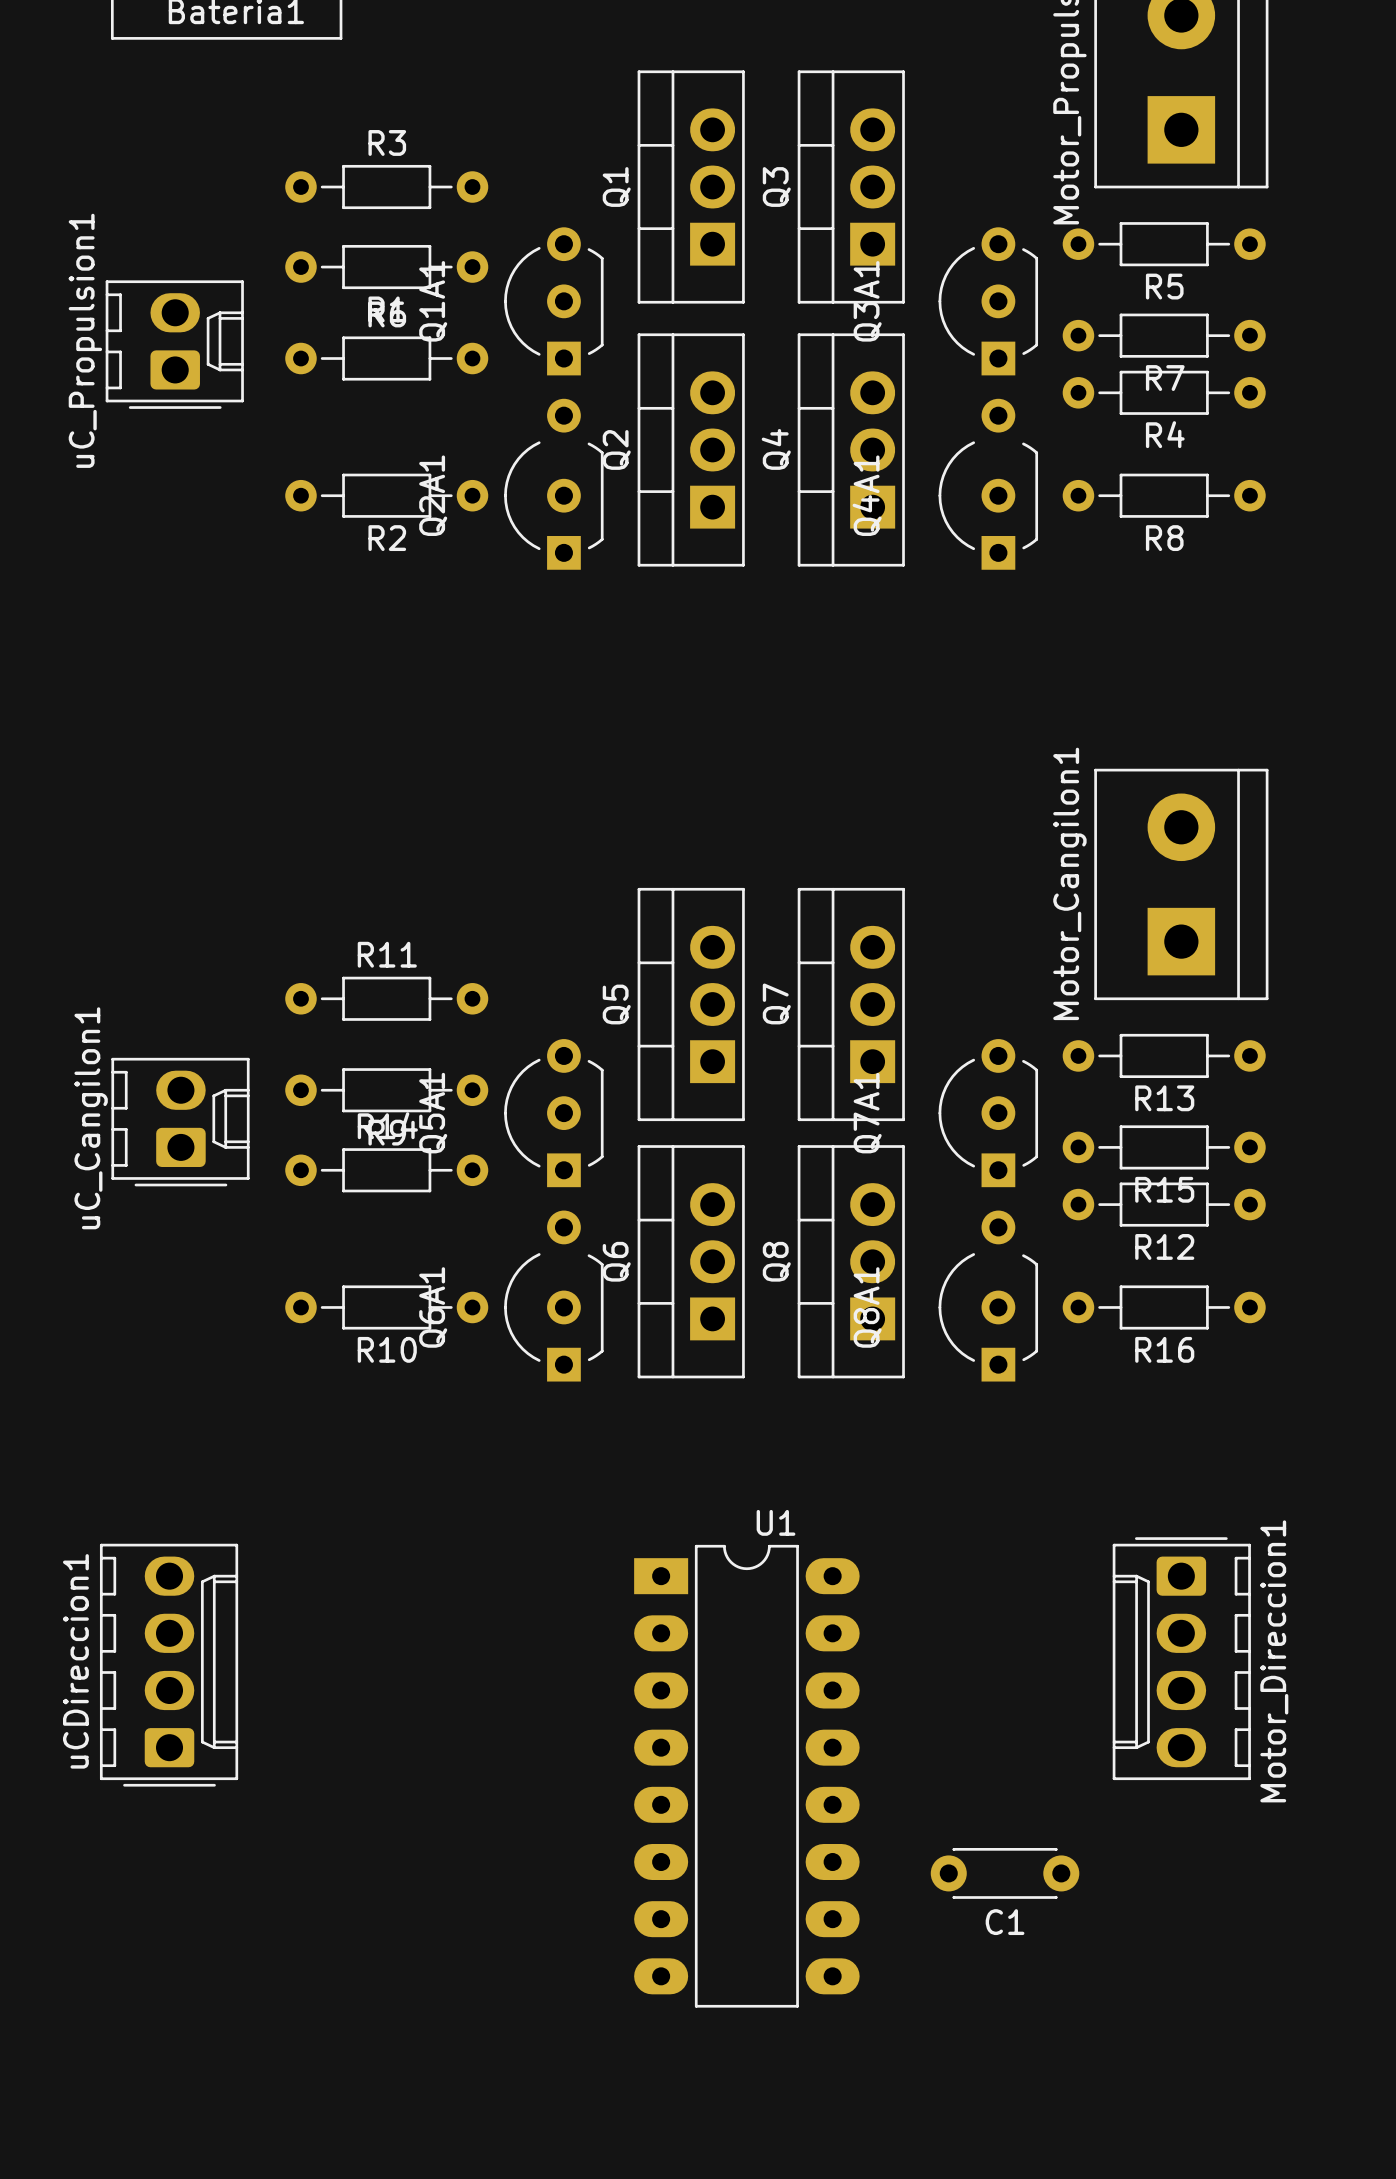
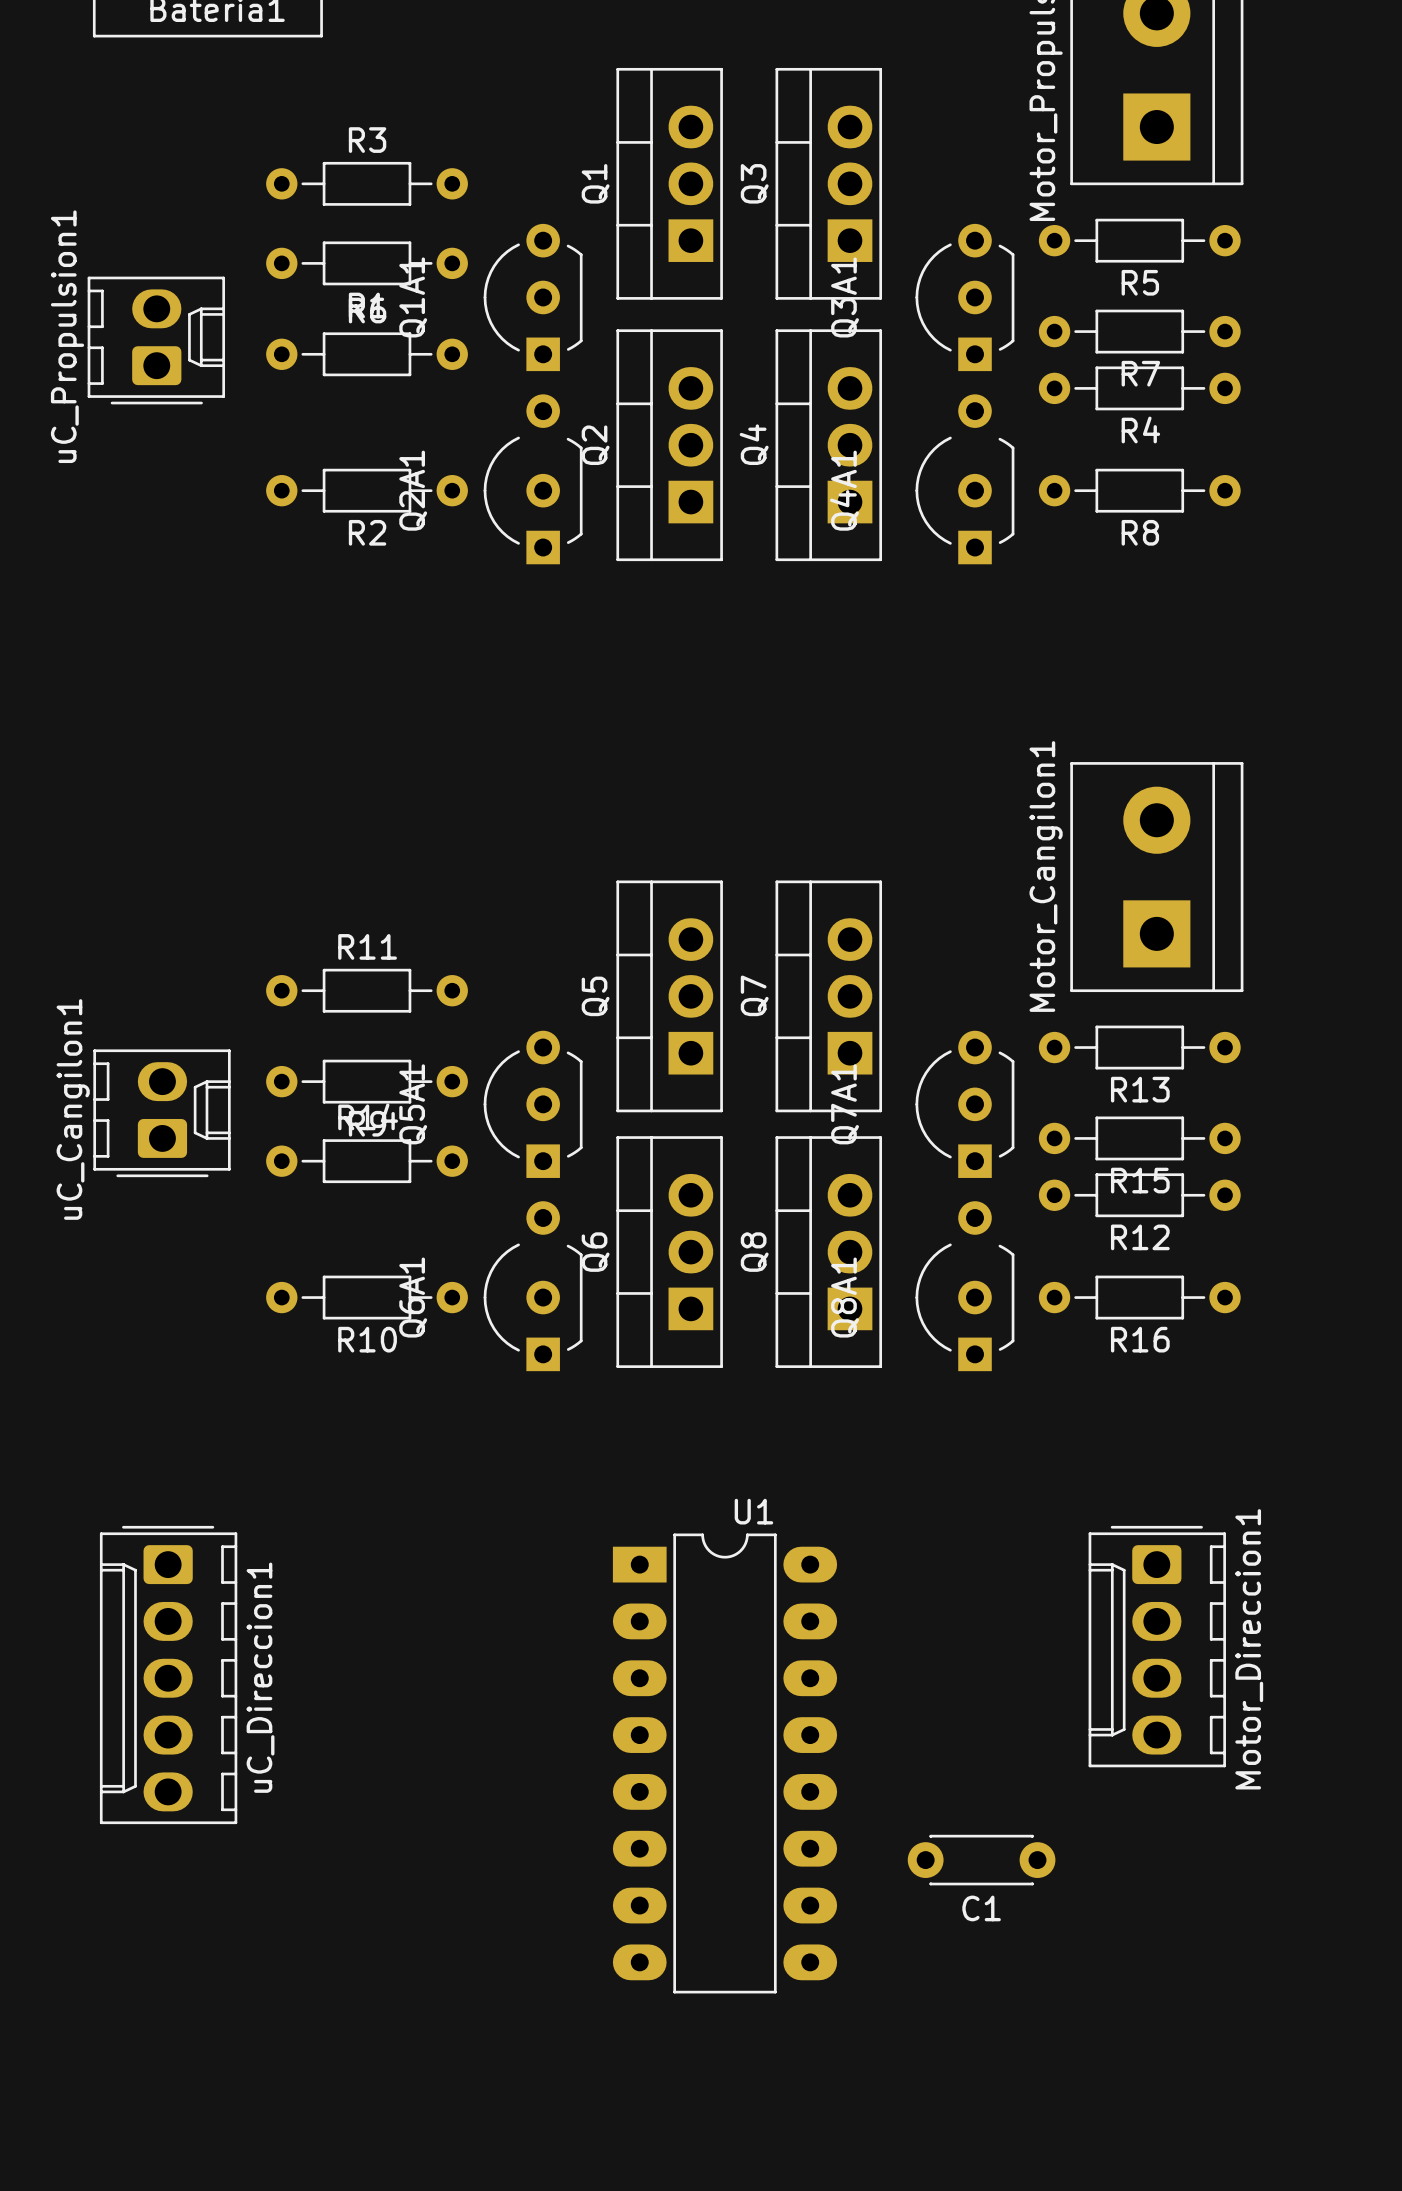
uCDireccion1: (169, 1665) -> none
uC_Direccion1: none -> (168, 1675)

